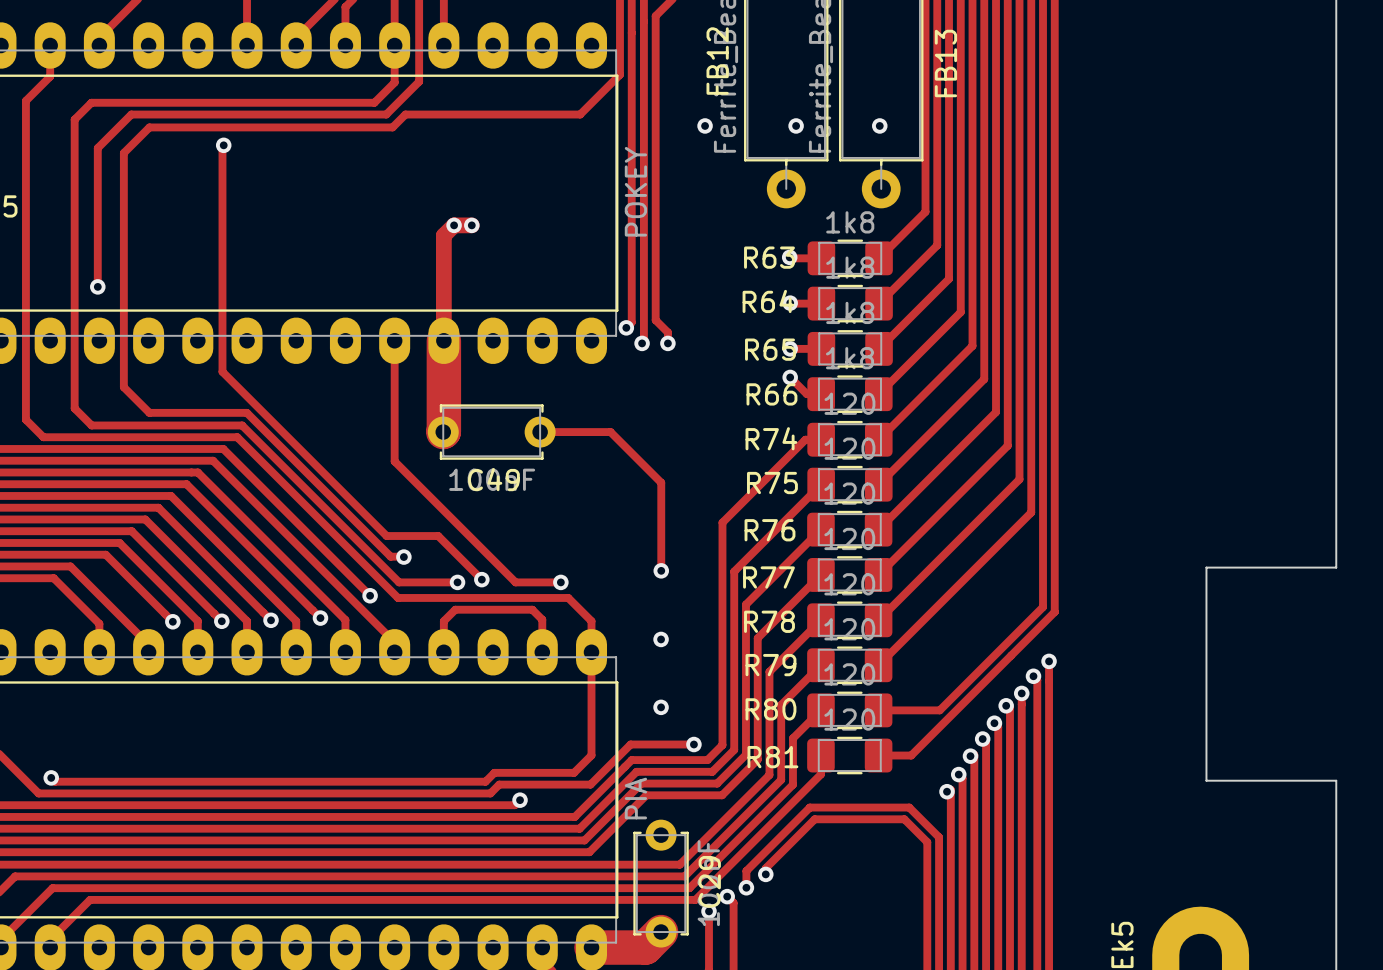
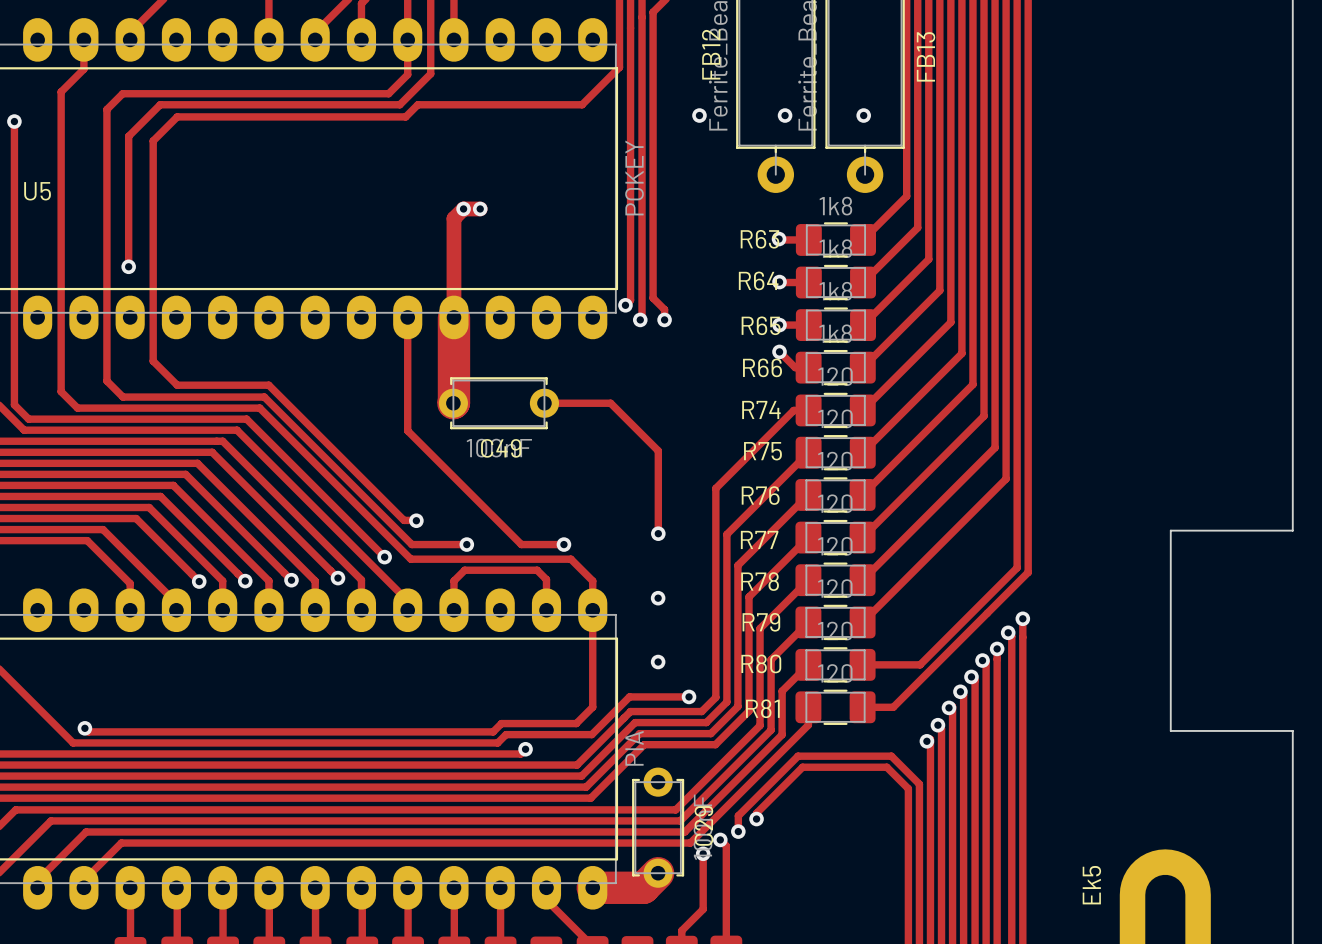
track: (223, 145) (222, 371) (386, 536) (438, 536) (481, 579) -> none
via: (223, 145) -> none
via: (481, 579) -> none

